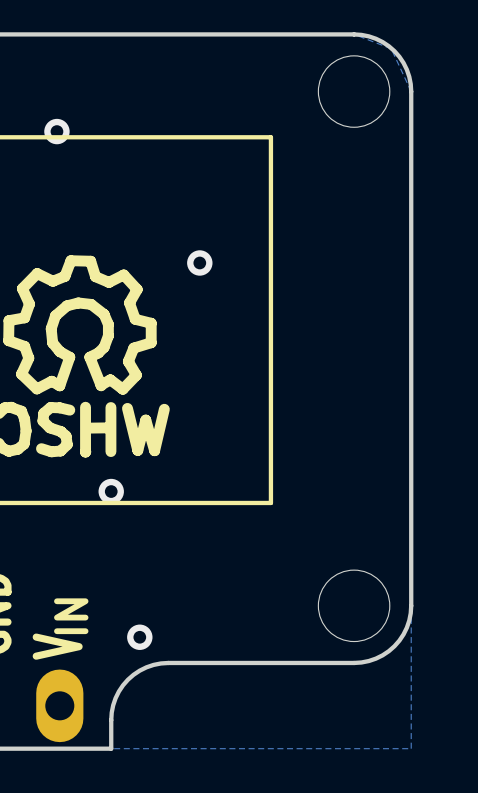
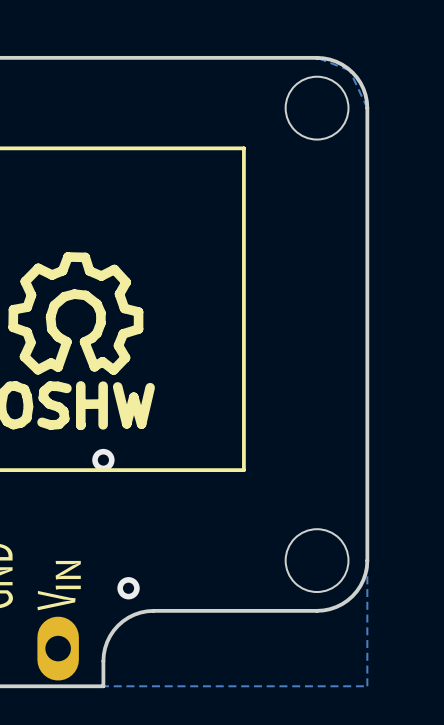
via: (56, 131) -> none
via: (199, 262) -> none

